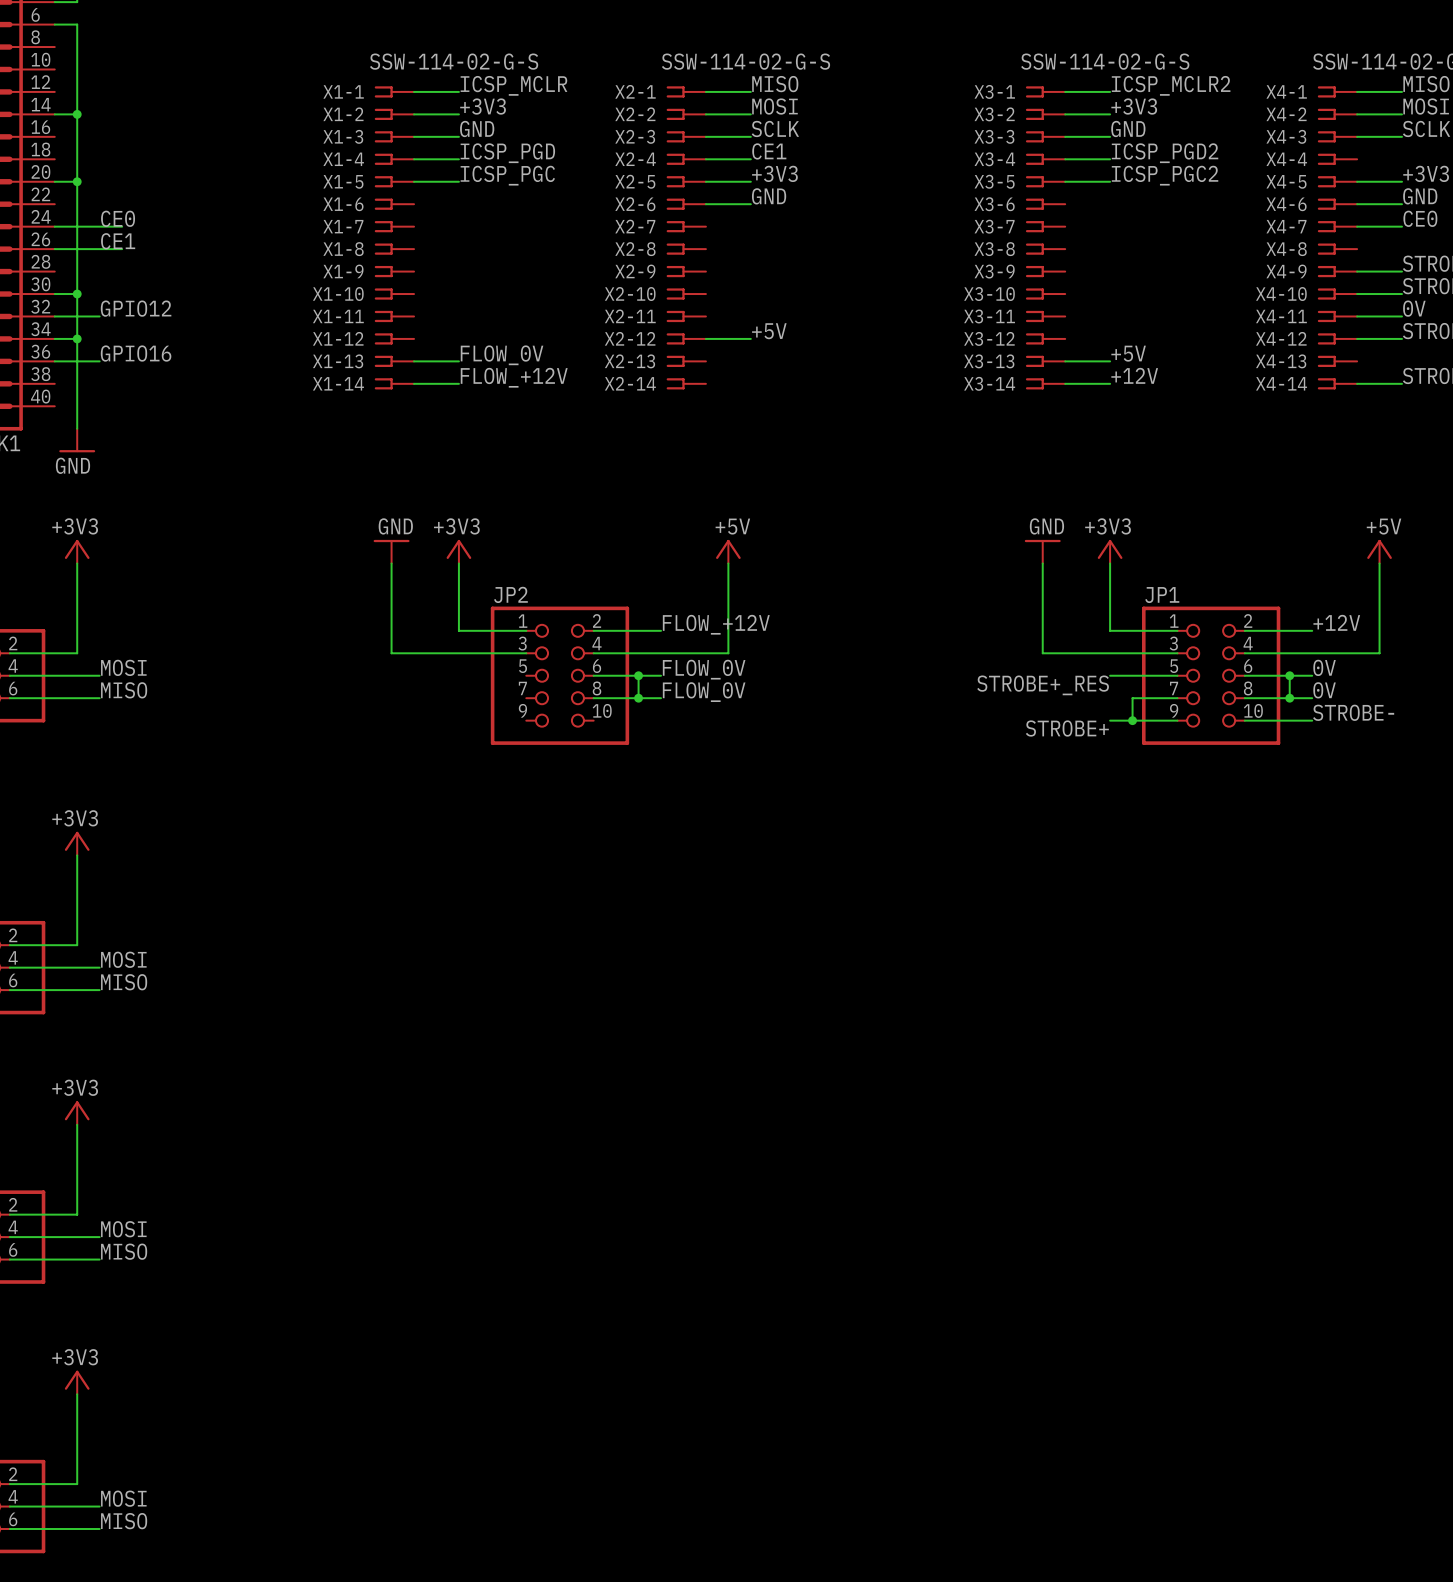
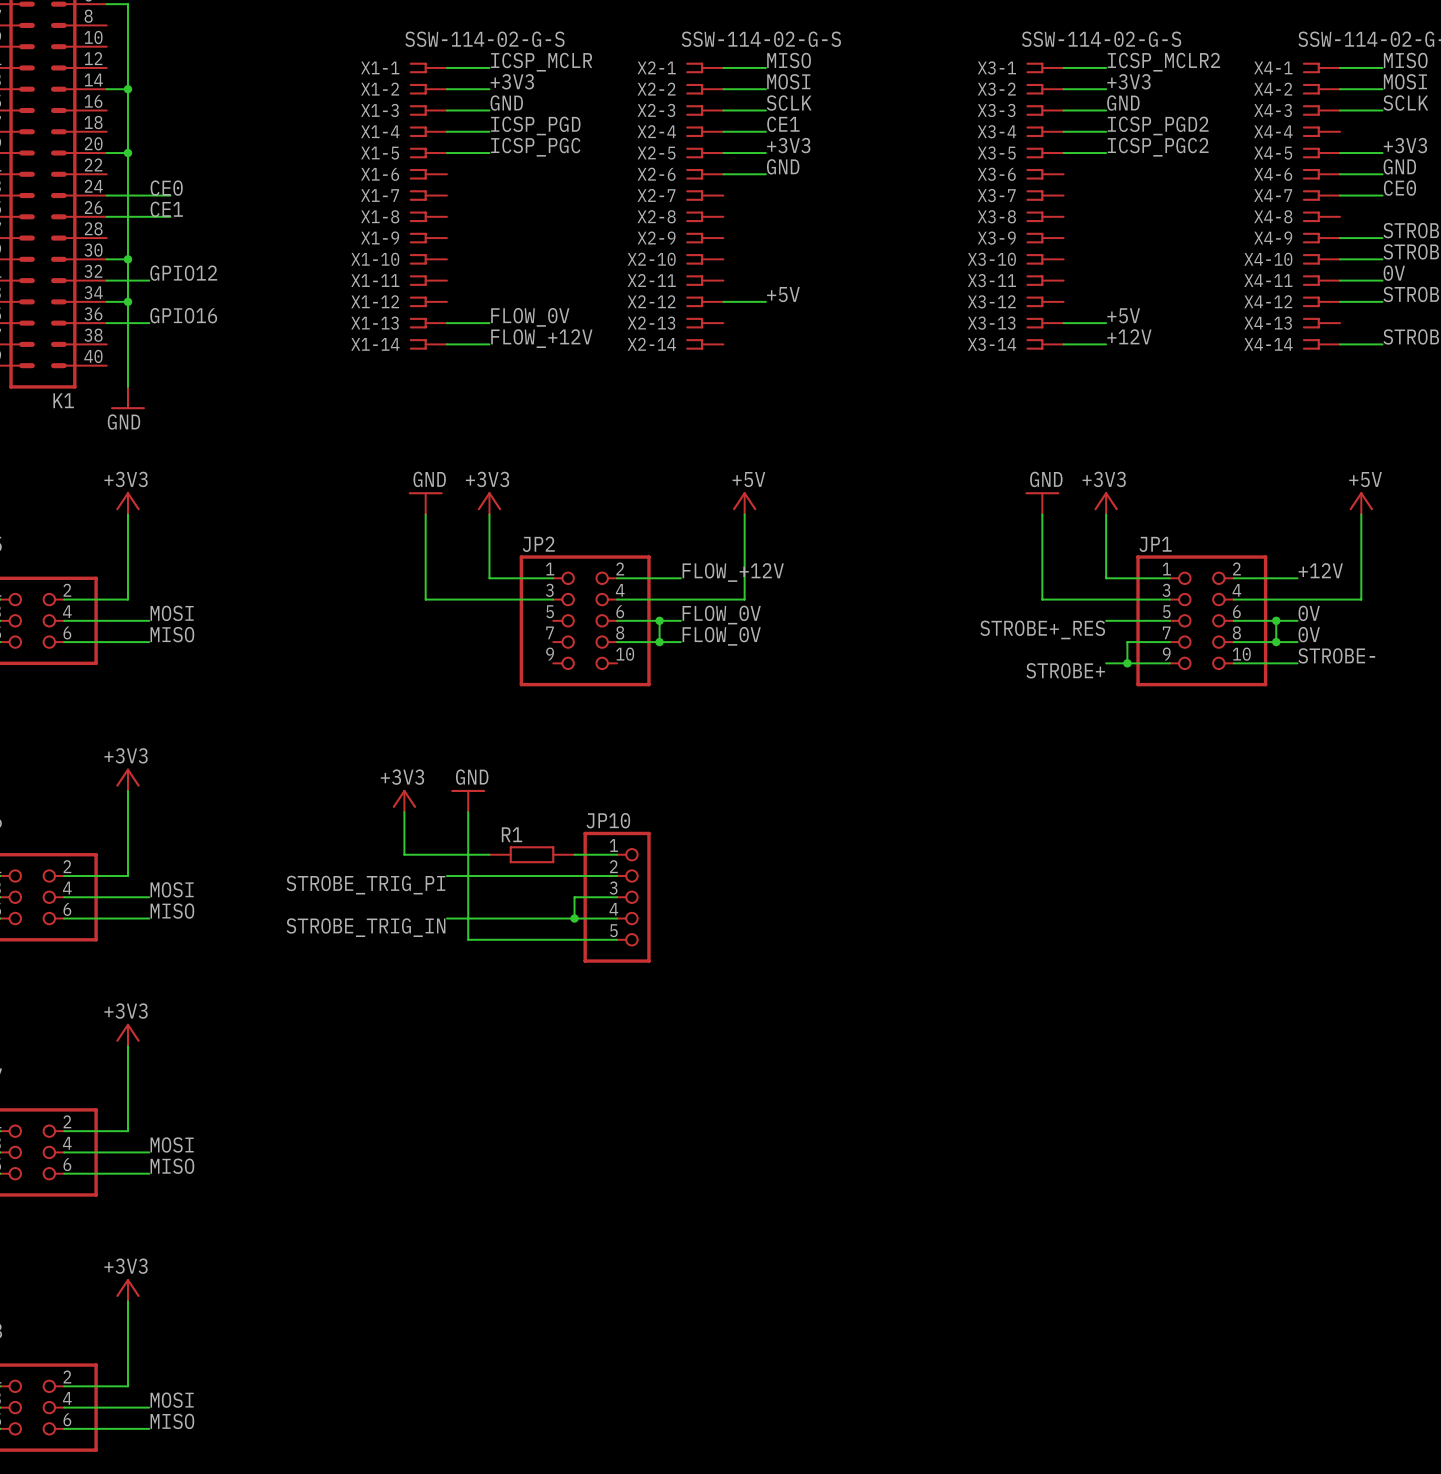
power symbol: none -> +3V3 (404, 801)
power symbol: none -> GND (468, 801)
wire: none -> (404, 812) (404, 854) (489, 854)
wire: none -> (468, 812) (468, 939) (617, 939)
R1: none -> (532, 854)
wire: none -> (574, 854) (617, 854)
wire: none -> (446, 876) (617, 876)
label: none -> STROBE_TRIG_PI (365, 885)
wire: none -> (617, 897) (574, 897) (574, 918)
JP10: none -> (617, 897)
wire: none -> (446, 918) (617, 918)
junction: none -> (574, 918)
label: none -> STROBE_TRIG_IN (366, 927)

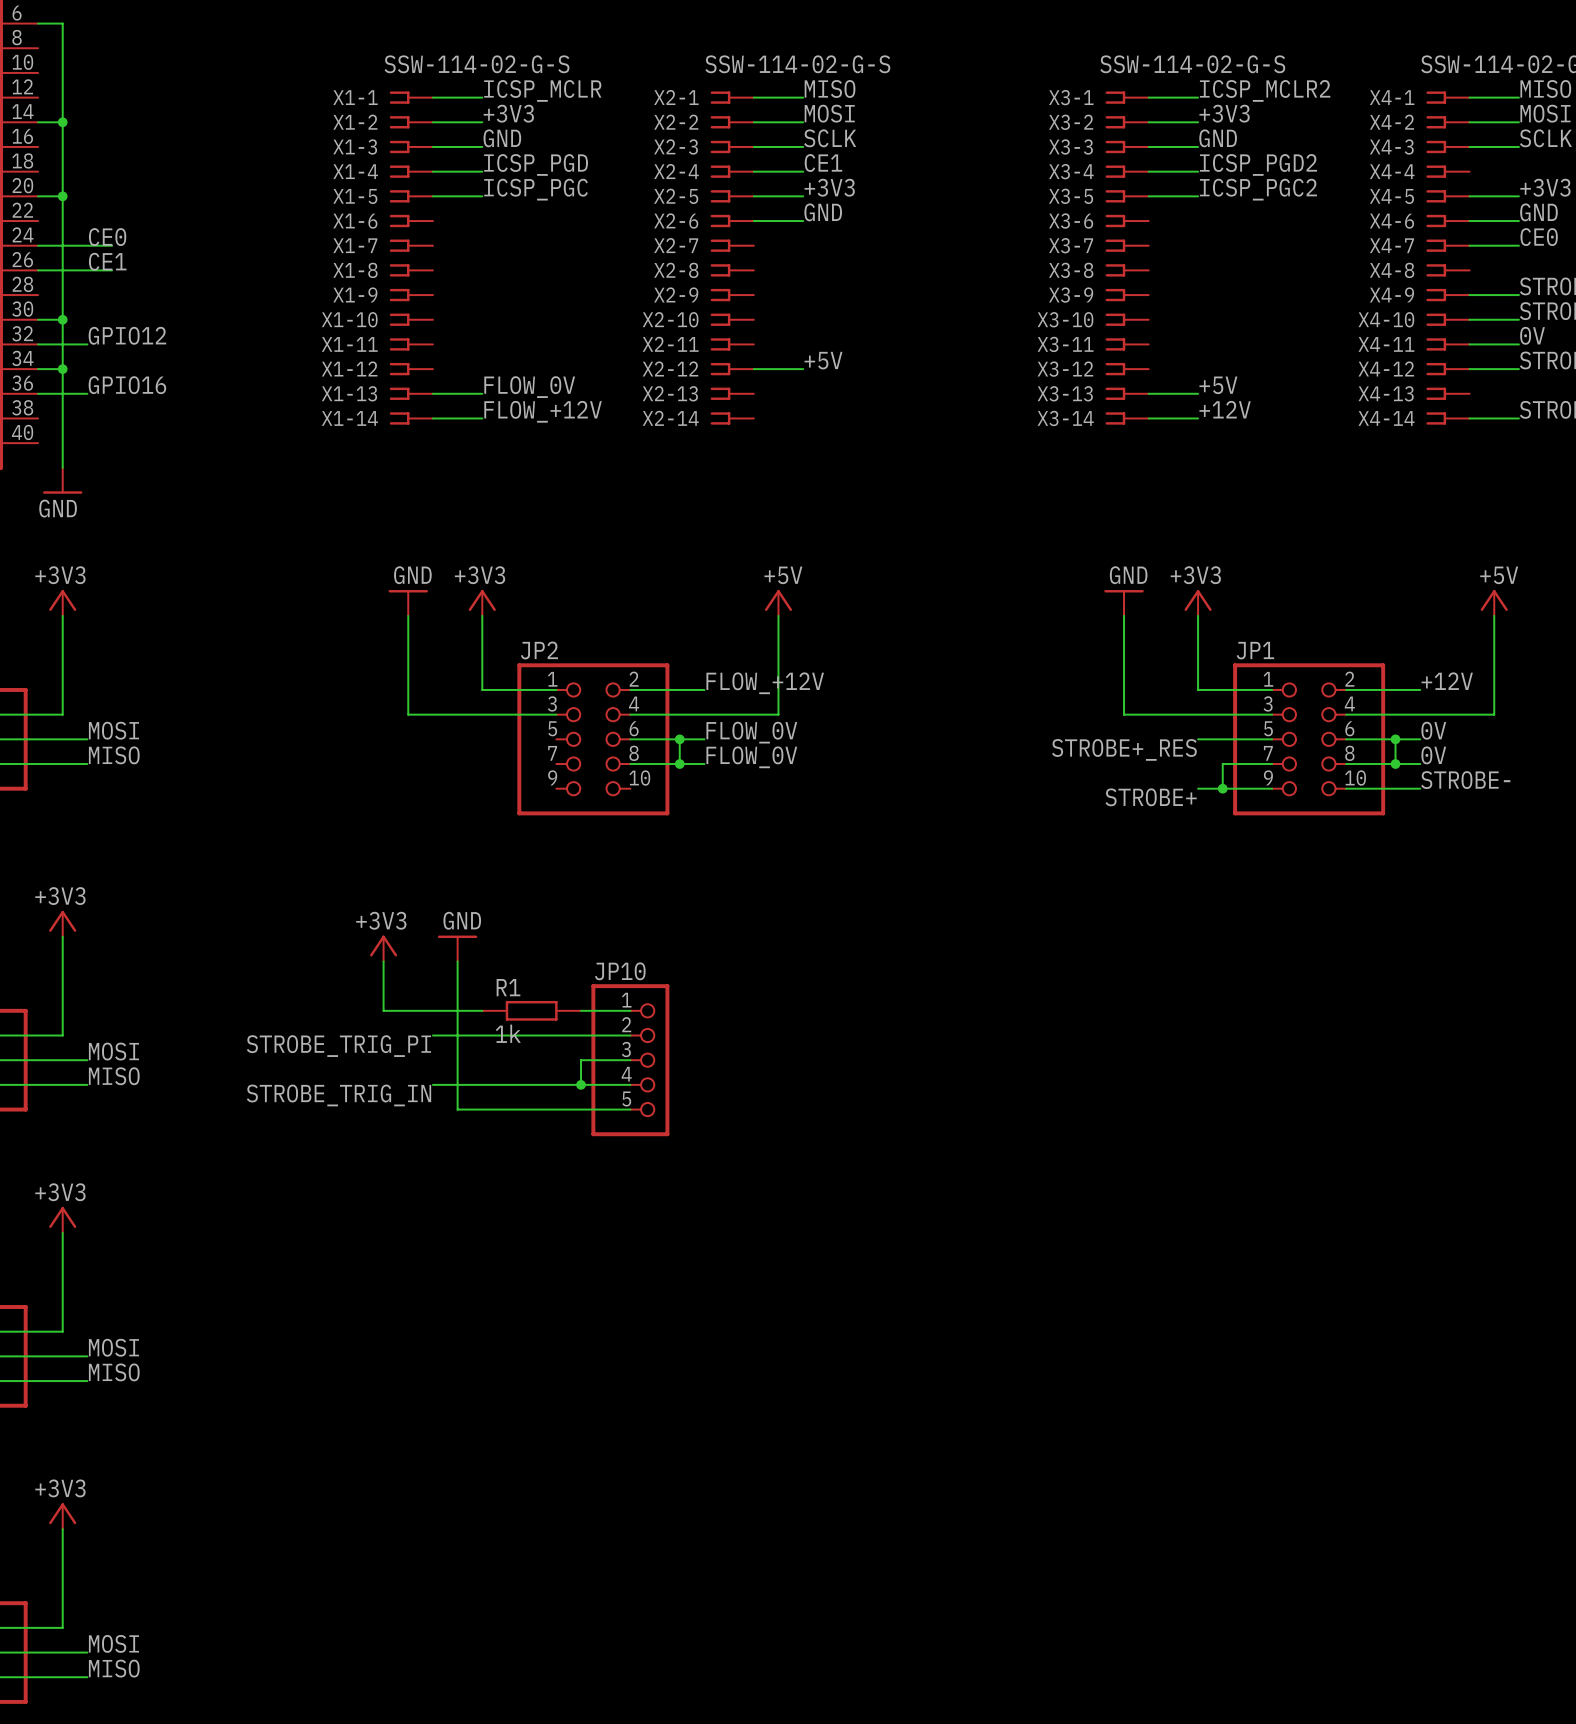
R1 value: none -> 1k (508, 1033)

